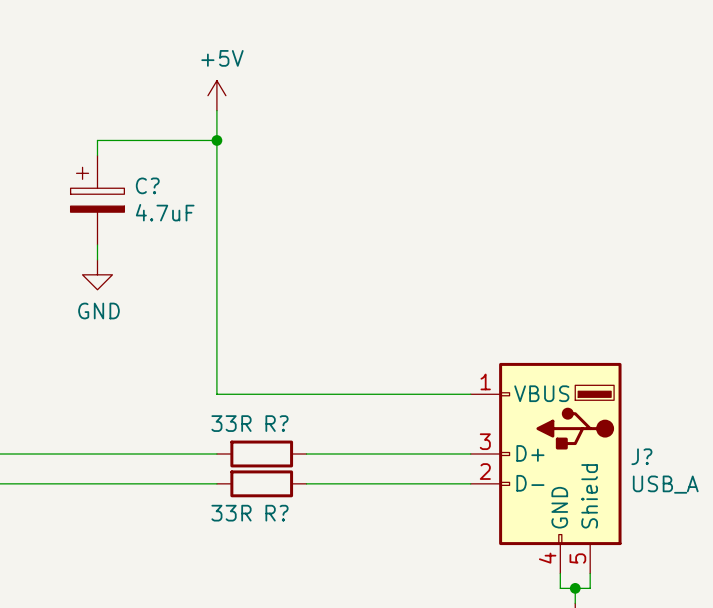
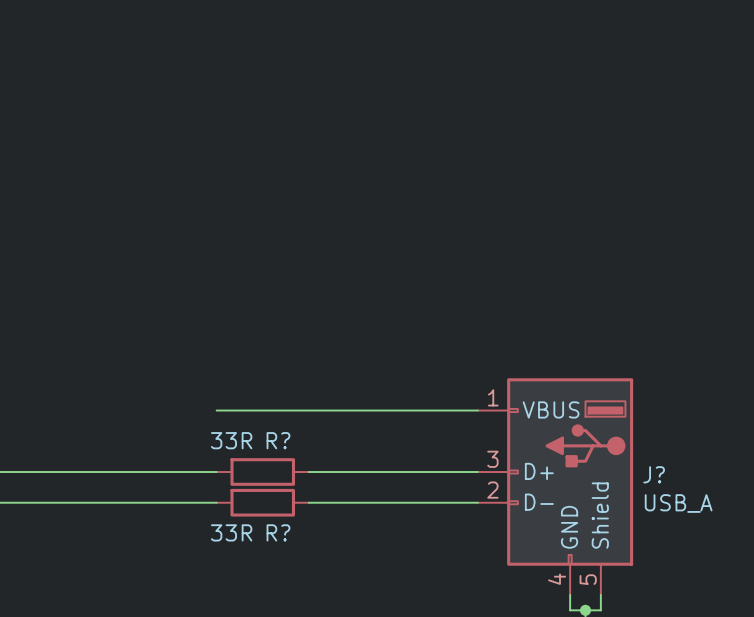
power symbol: +5V (216, 95) -> none
wire: (216, 110) (216, 394) -> none
wire: (216, 140) (97, 140) (97, 155) -> none
junction: (216, 140) -> none
C?: 4.7uF (97, 200) -> none
wire: (97, 244) (97, 259) -> none
power symbol: GND (97, 274) -> none

